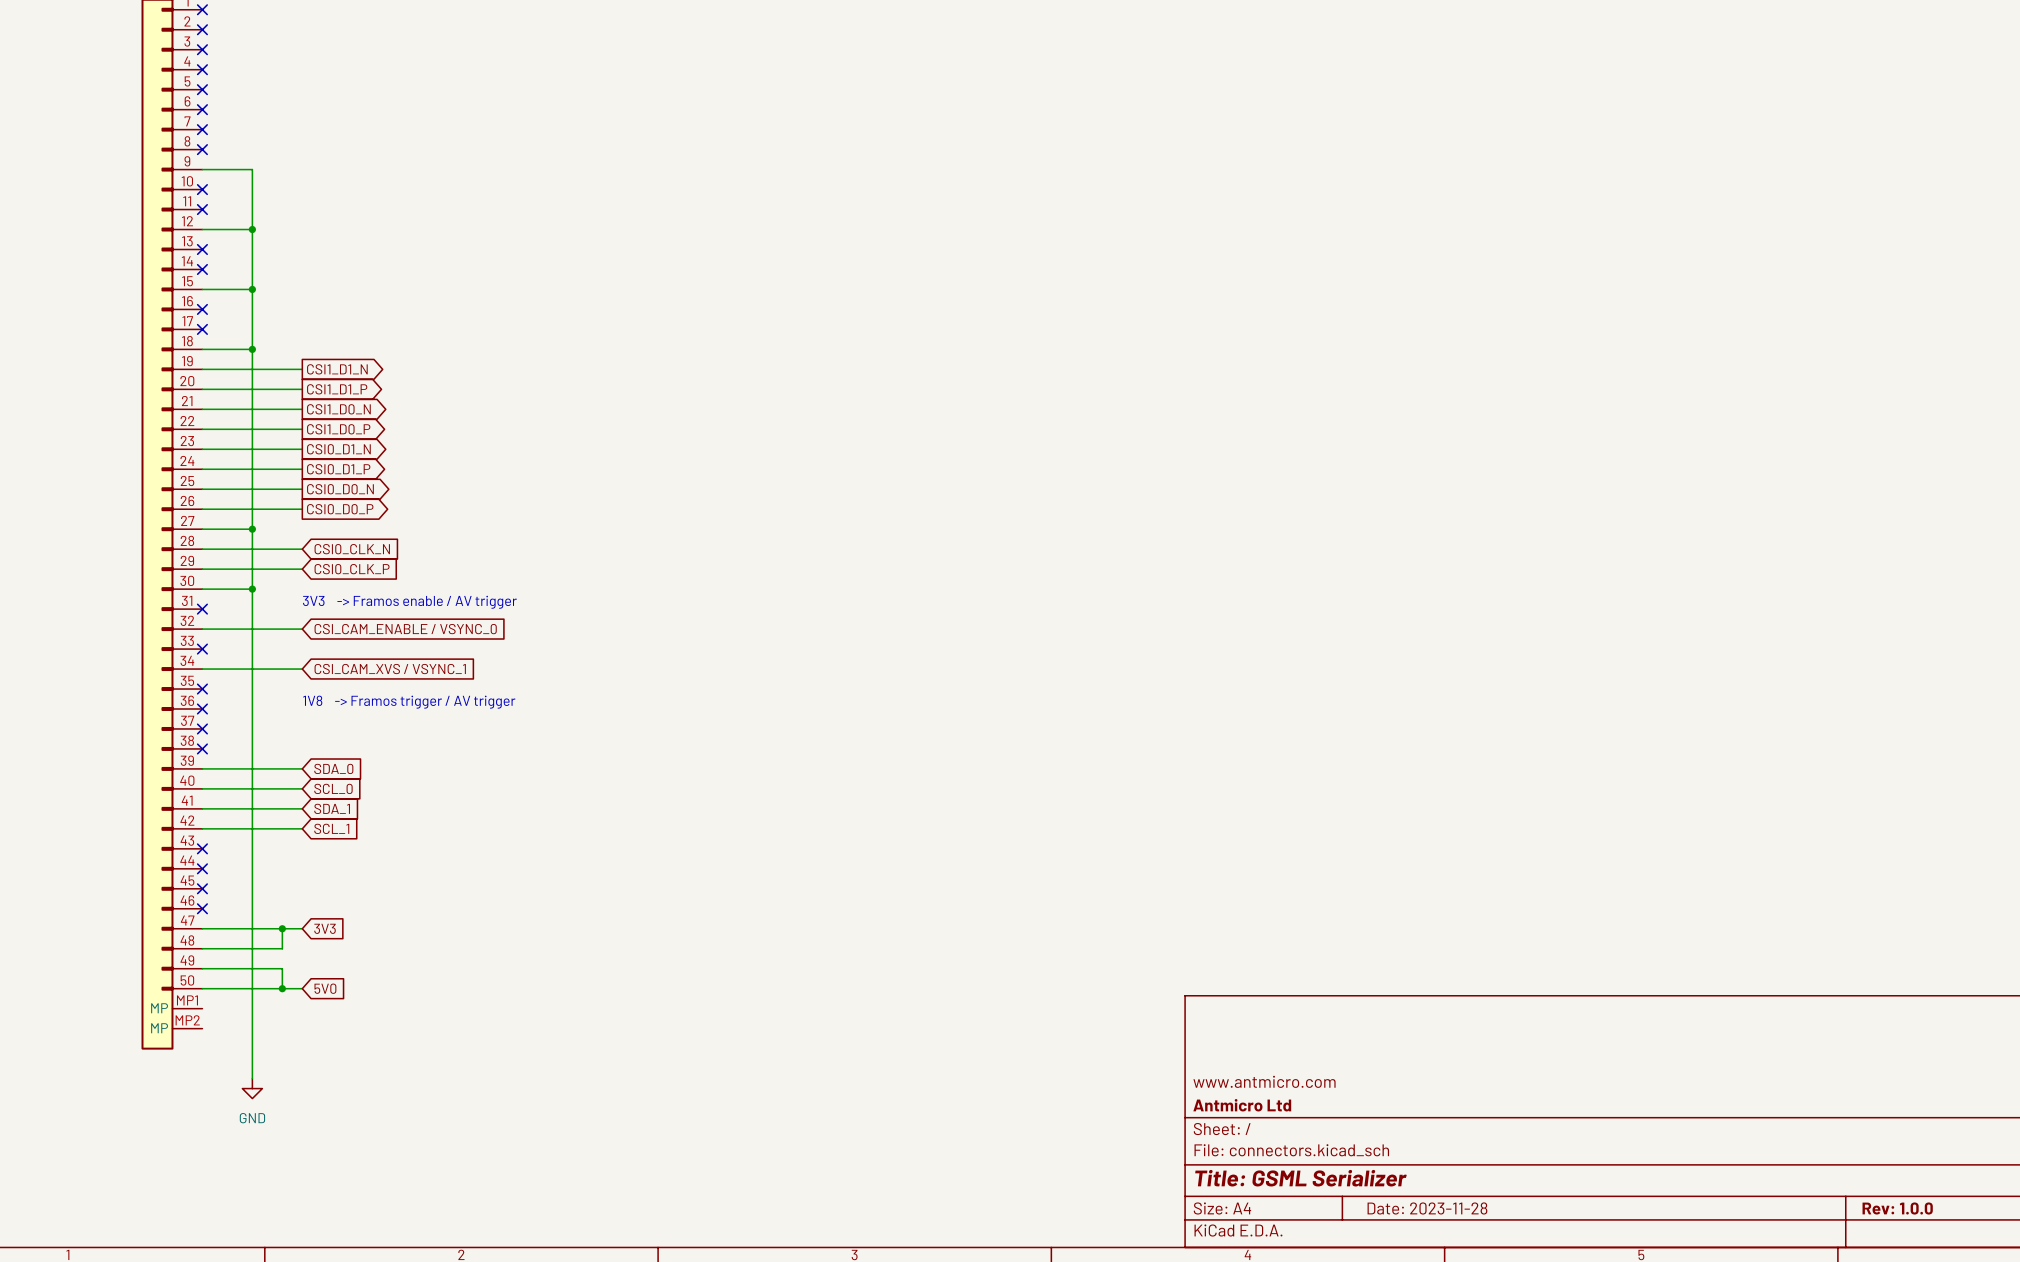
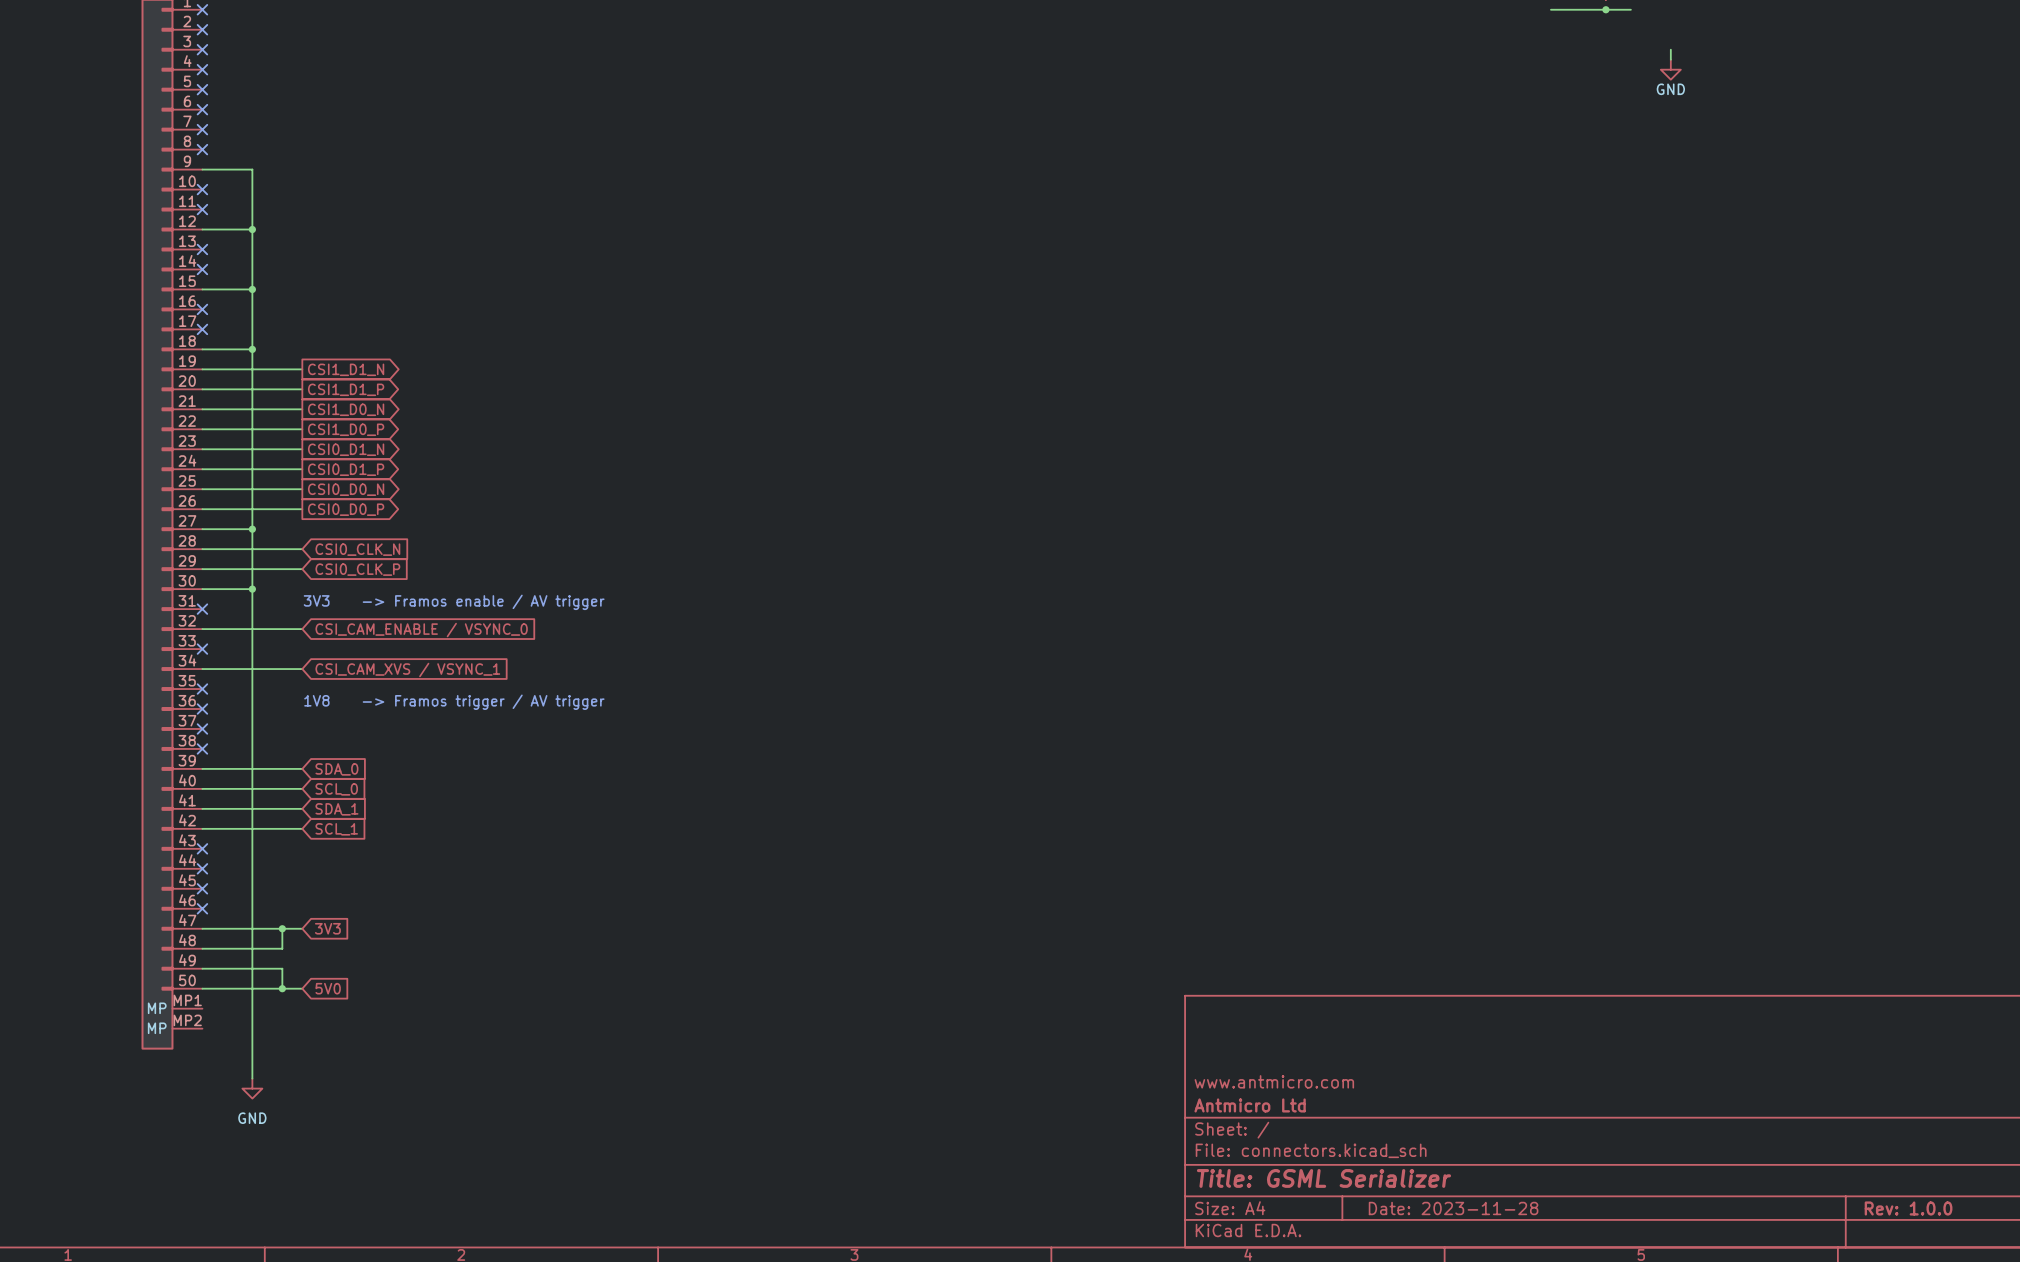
wire: none -> (1550, 9) (1630, 9)
junction: none -> (1605, 9)
wire: none -> (1670, 49) (1670, 59)
power symbol: none -> GND (1670, 69)

